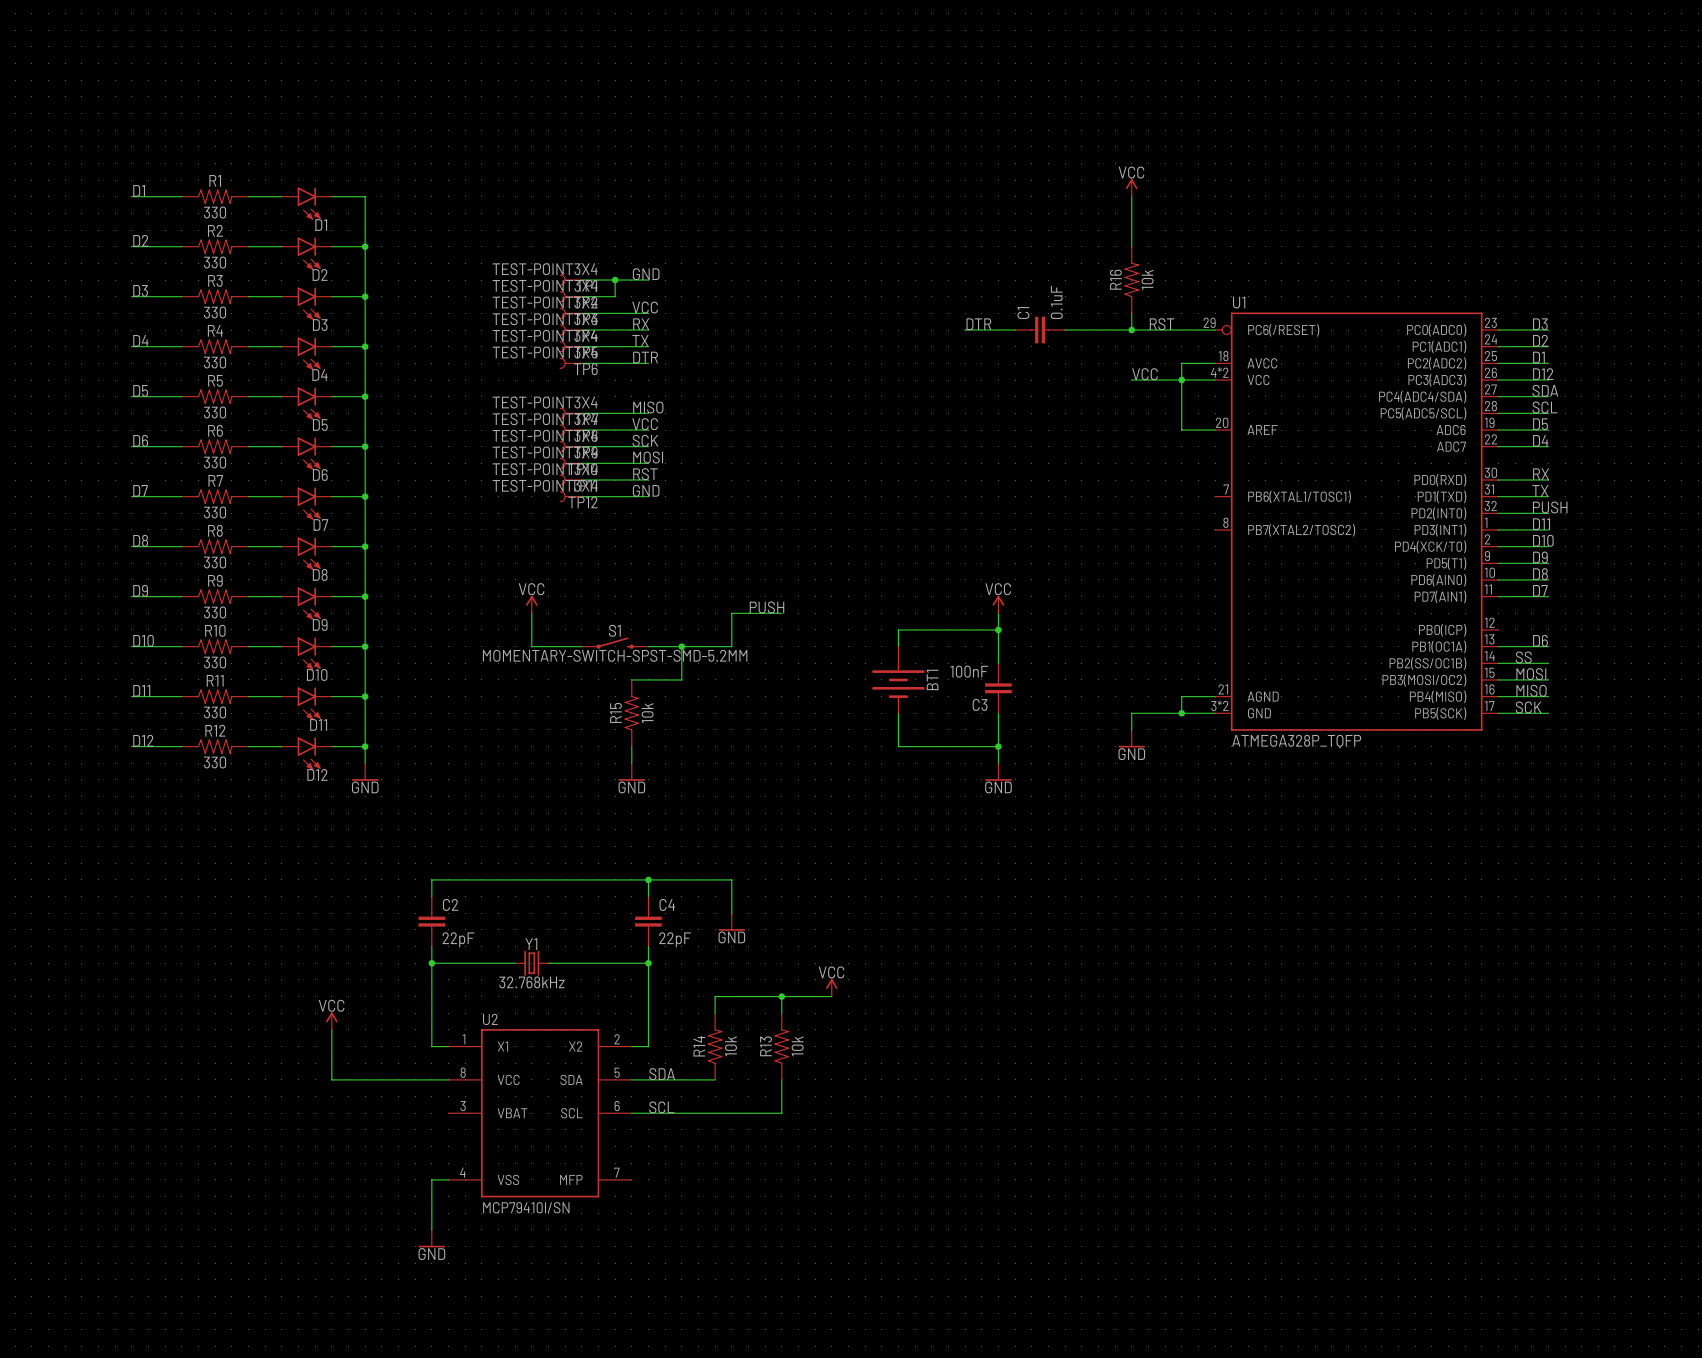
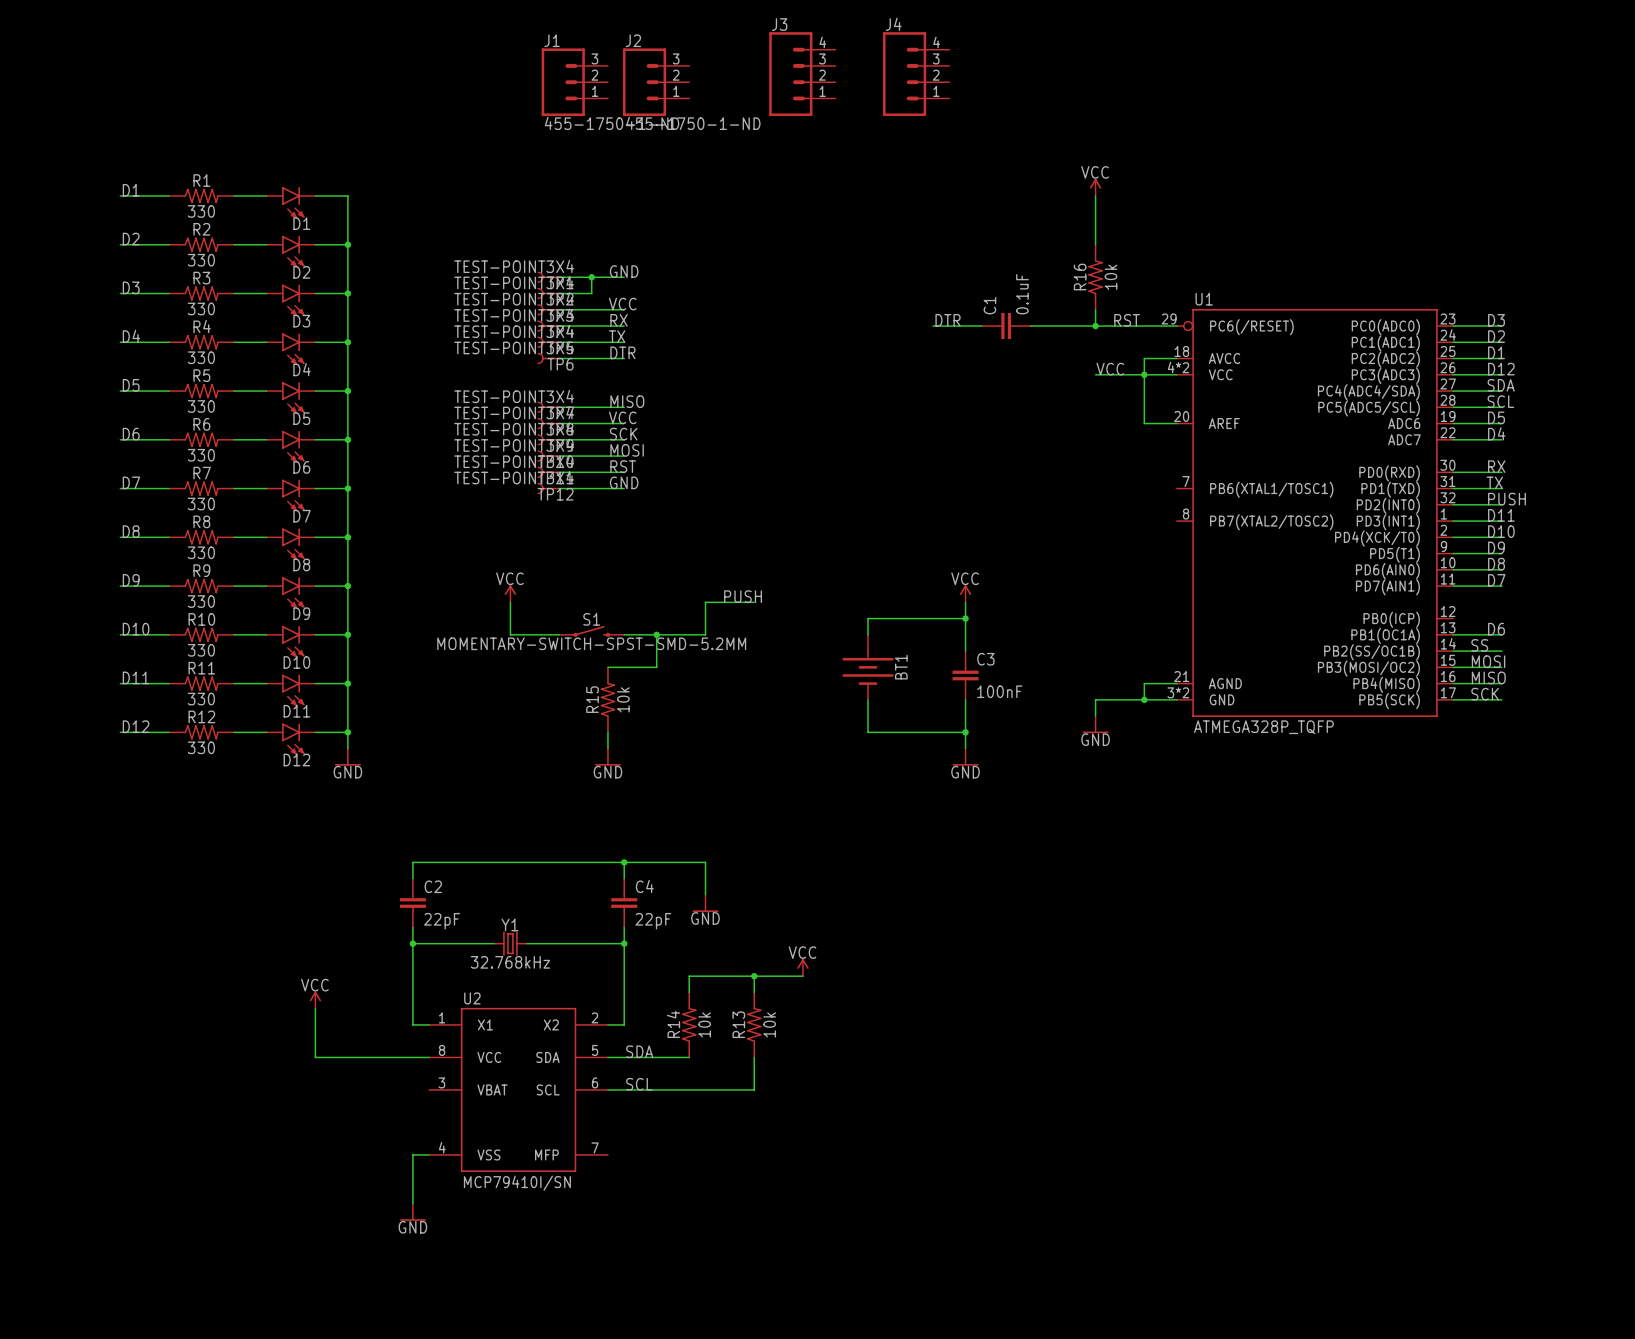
J3: none -> (802, 74)
J4: none -> (916, 74)
J1: none -> 455-1750-1-ND (574, 82)
J2: none -> 455-1750-1-ND (656, 82)
C3 value position: 100nF (969, 671) -> 100nF (999, 691)
C3 name position: C3 (980, 704) -> C3 (985, 659)

